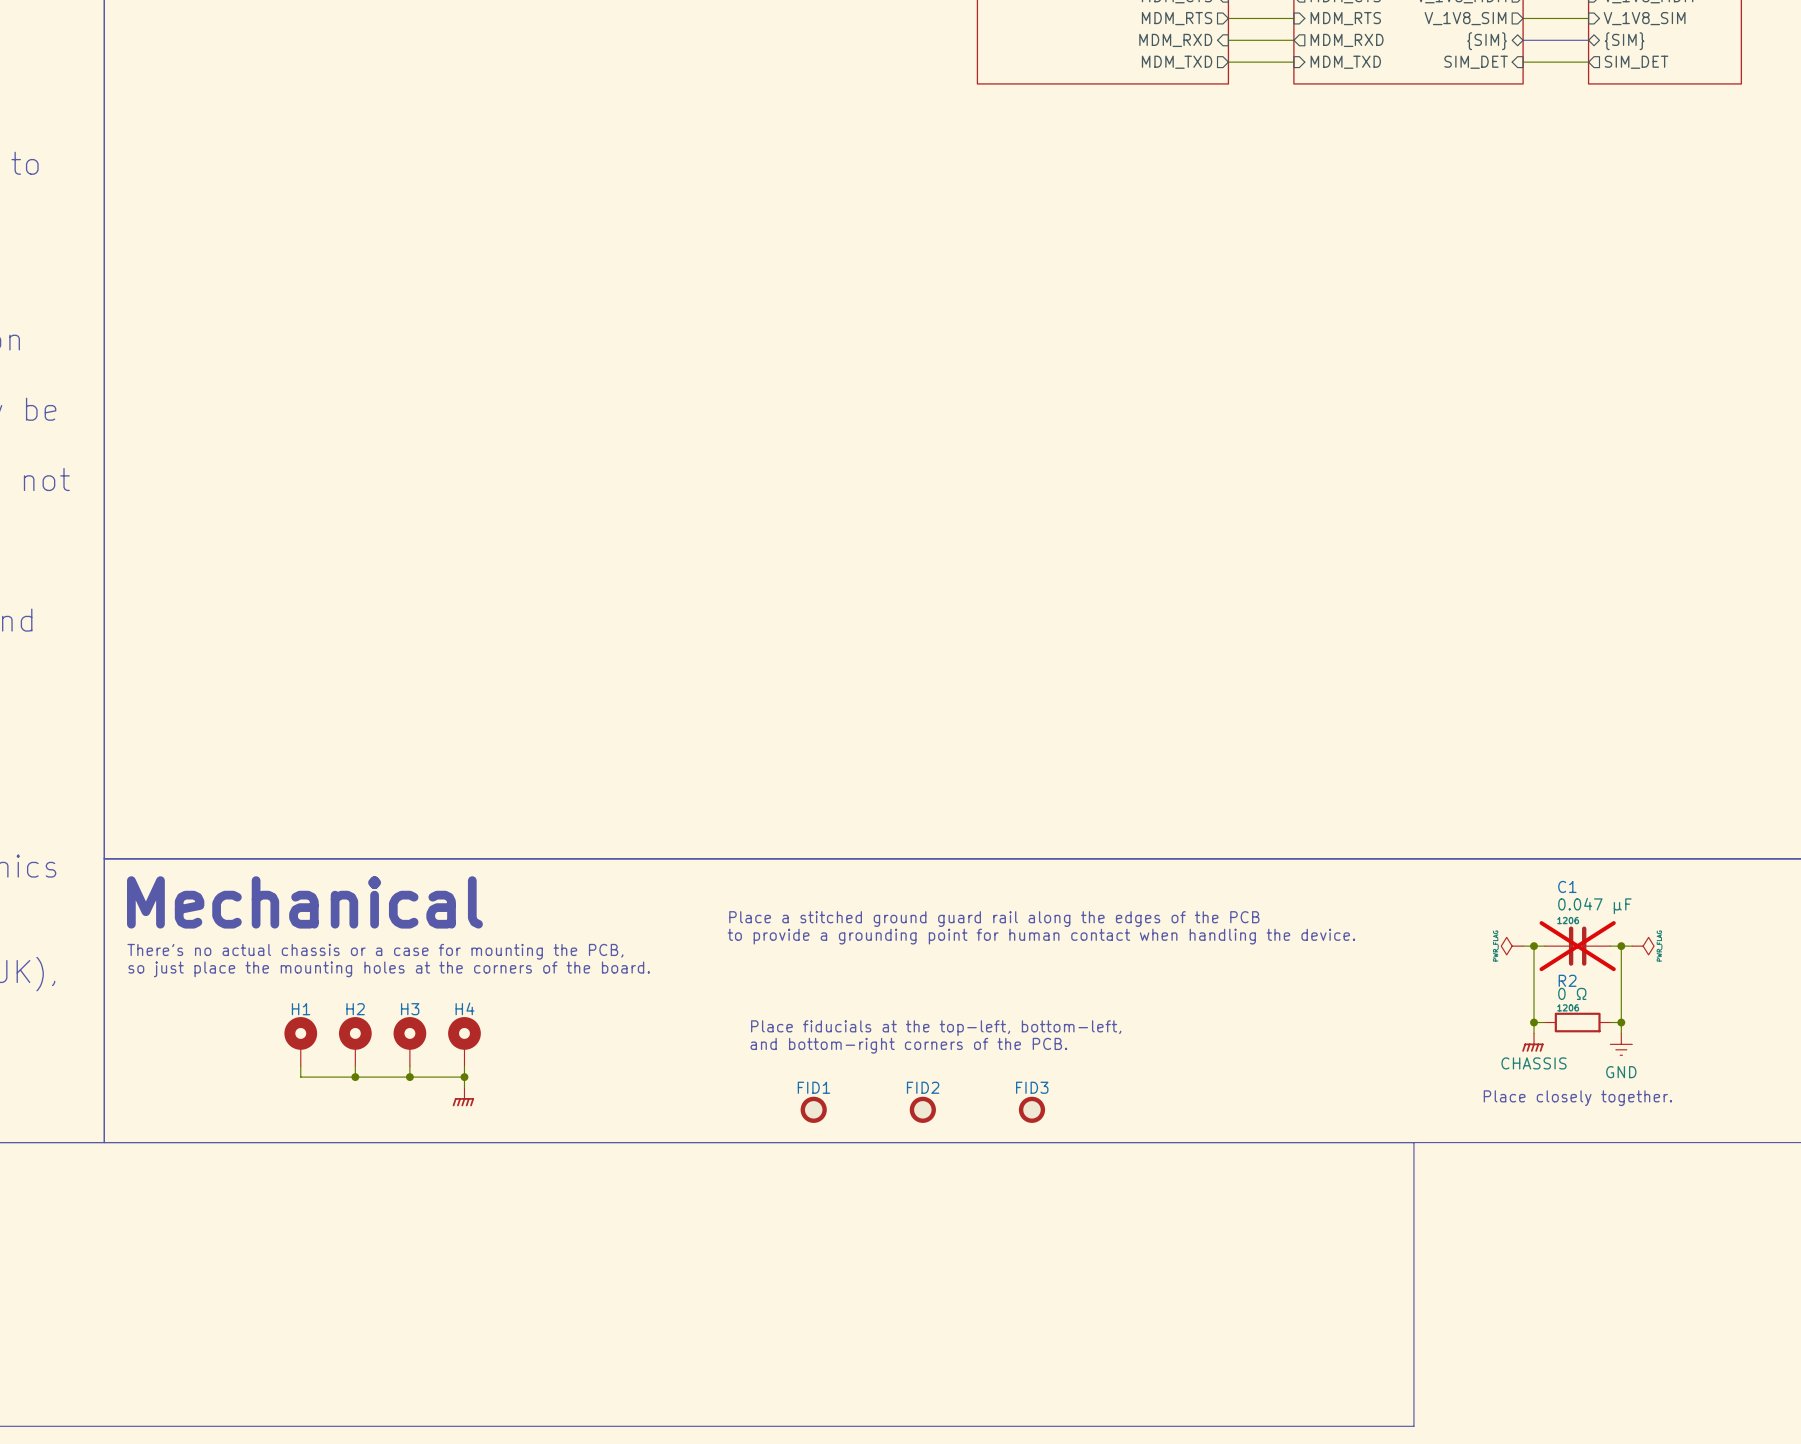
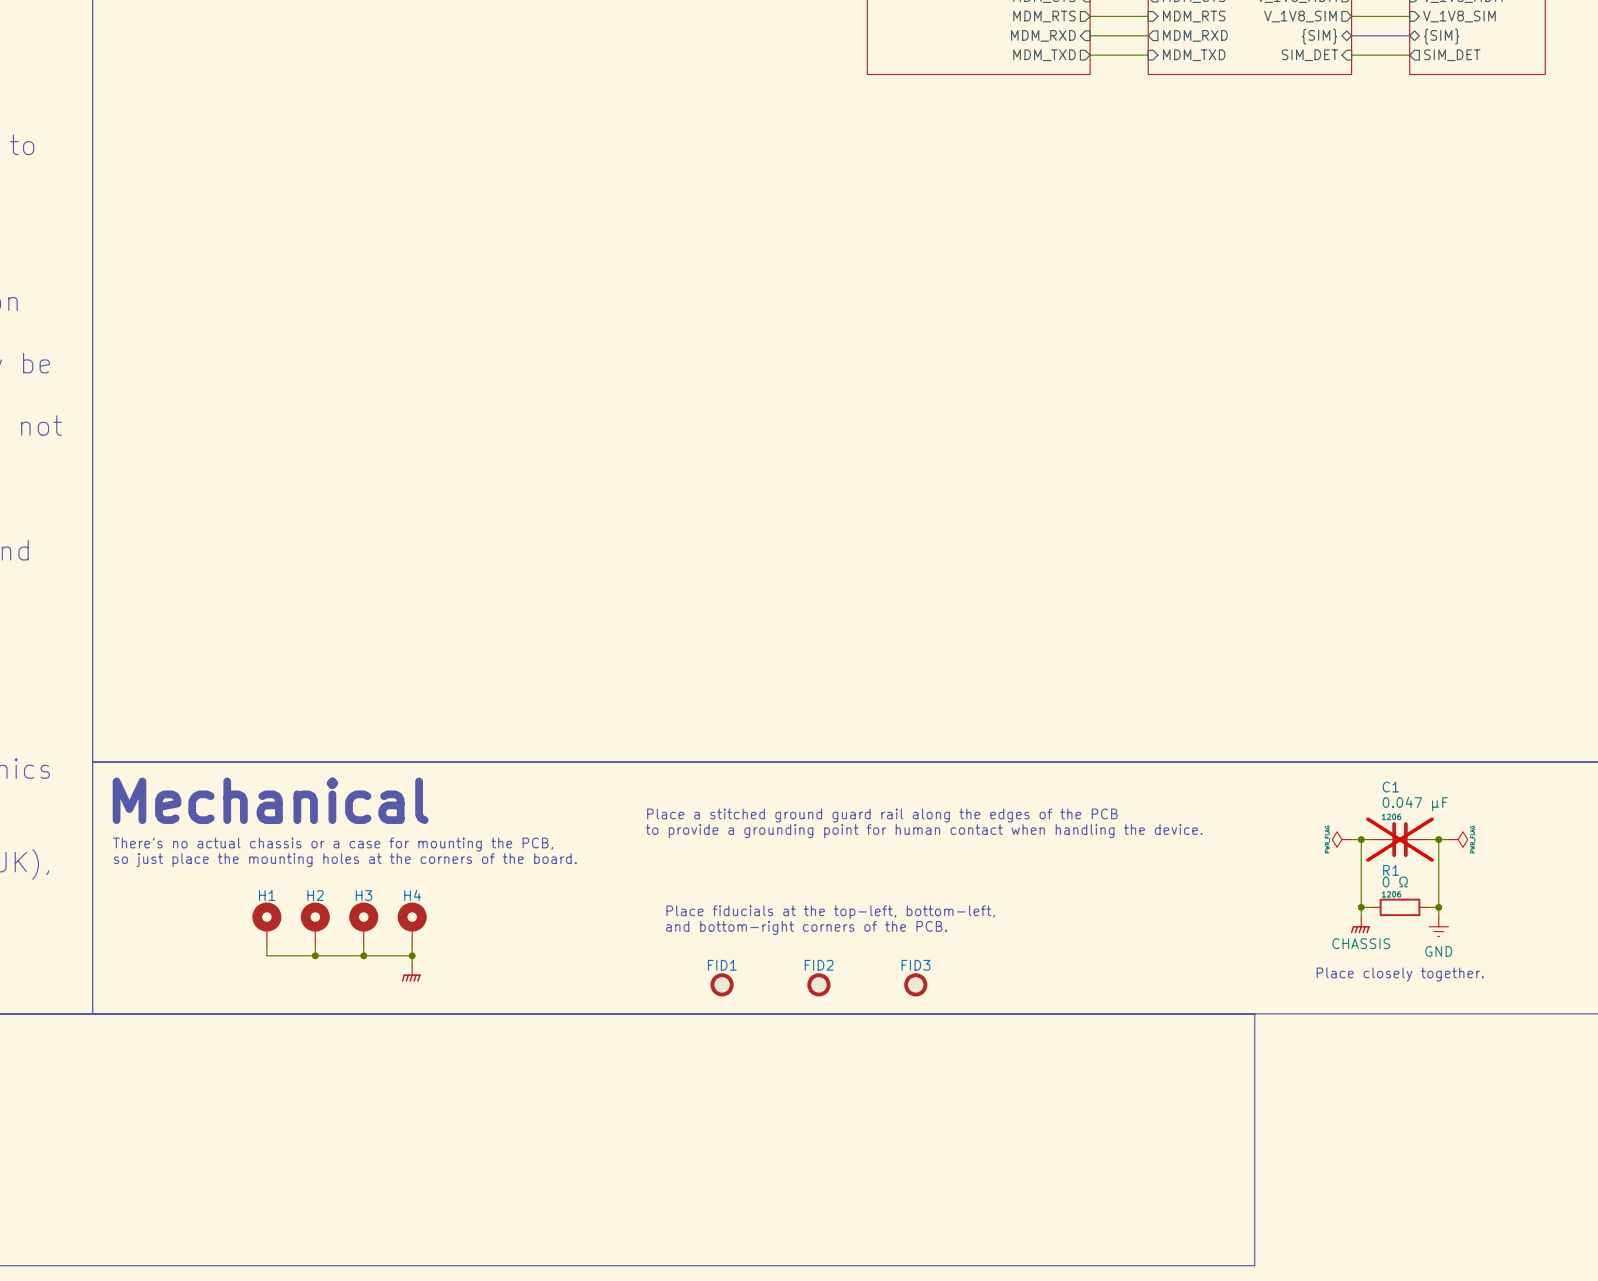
R2 name: R2 (1567, 980) -> R1 (1391, 870)

